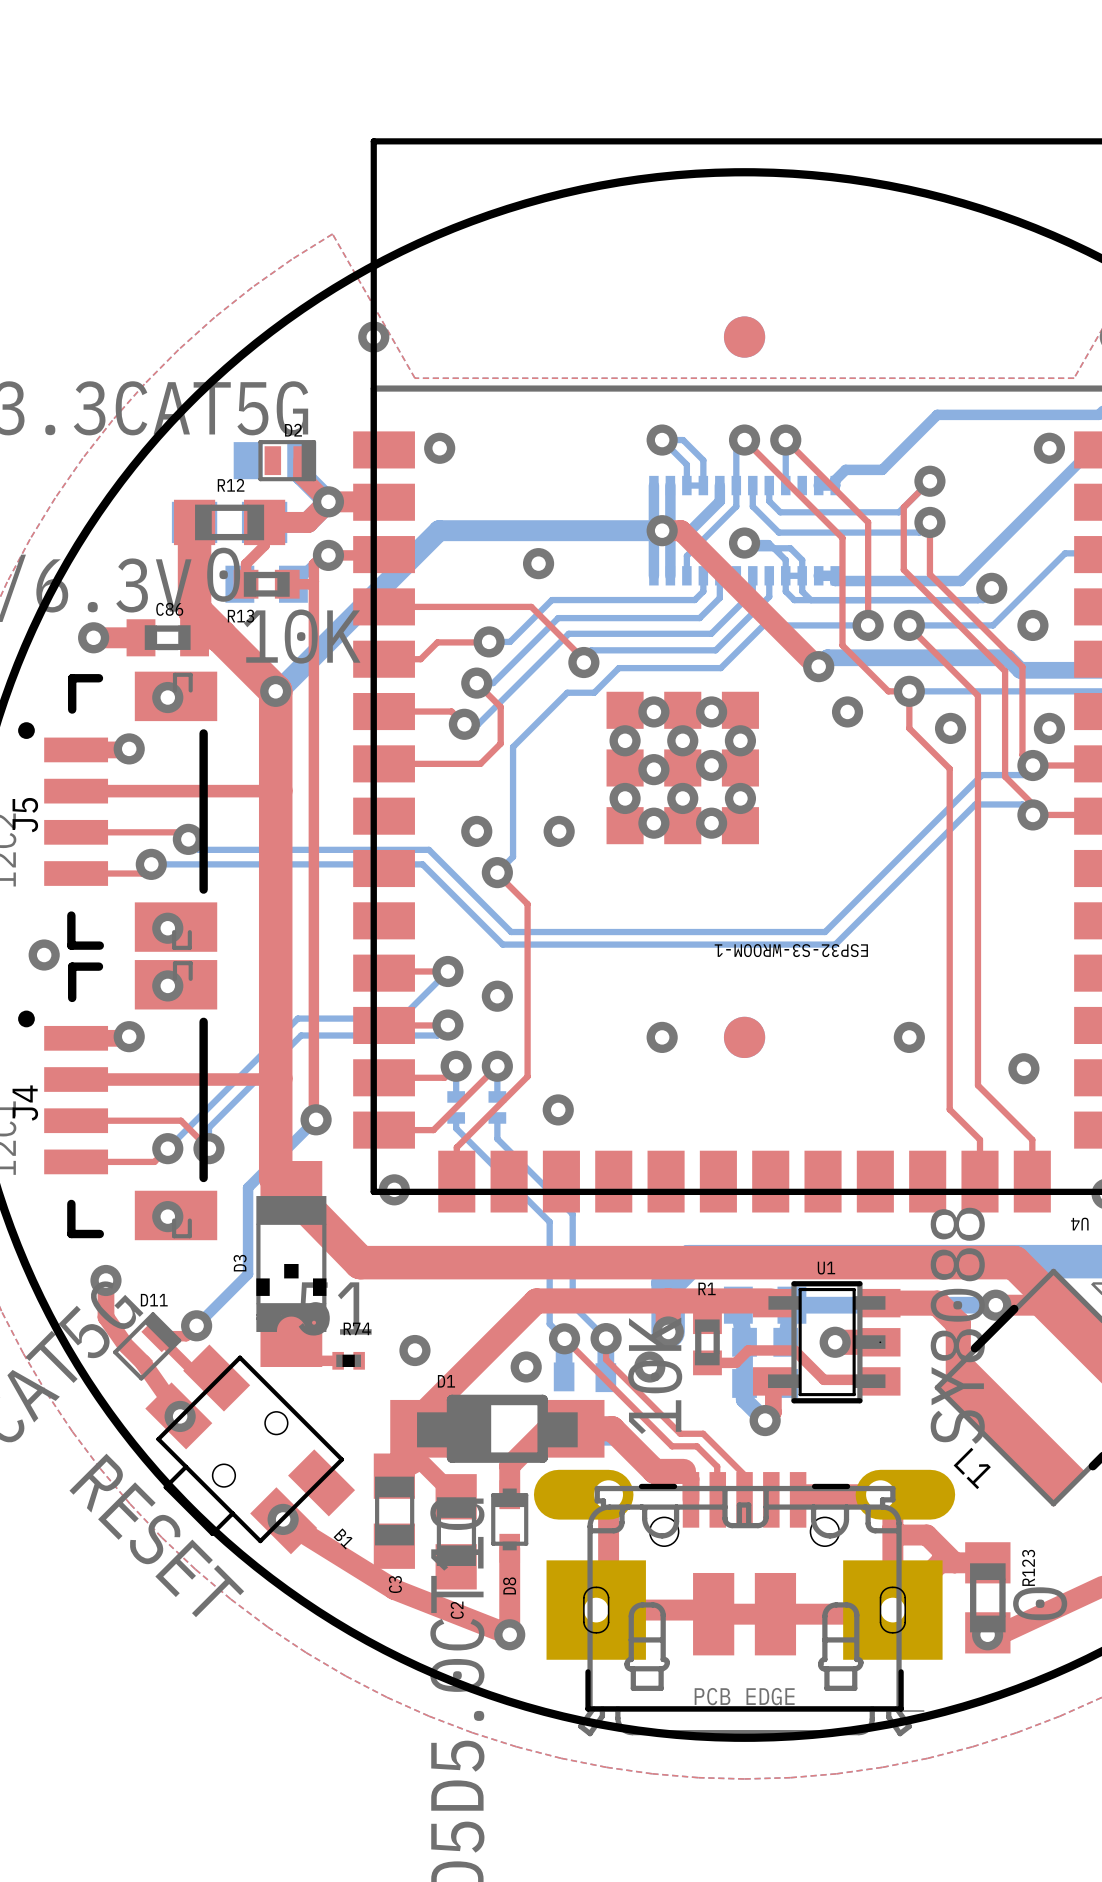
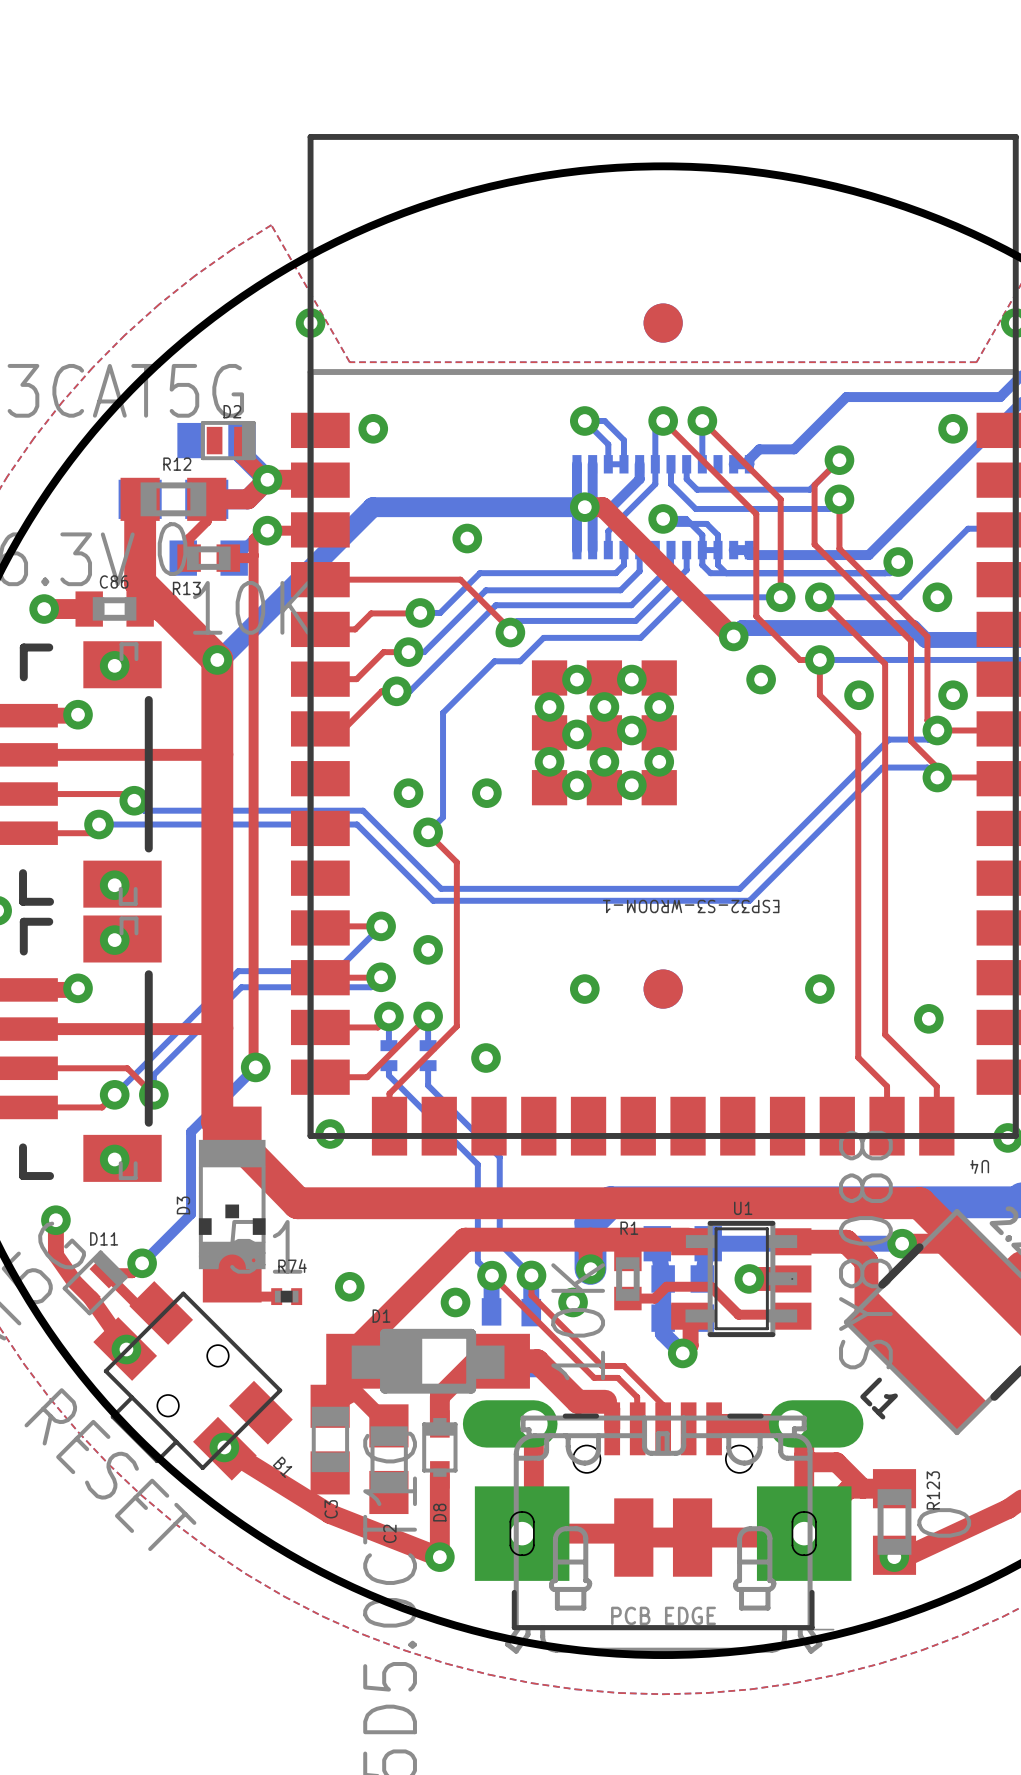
top track: (476, 683) (500, 707) (500, 743) (480, 763) (409, 763) -> (396, 691) (381, 691) (344, 728)
top track: (422, 711) (451, 711) (464, 724) -> (356, 679) (383, 652) (408, 652)

